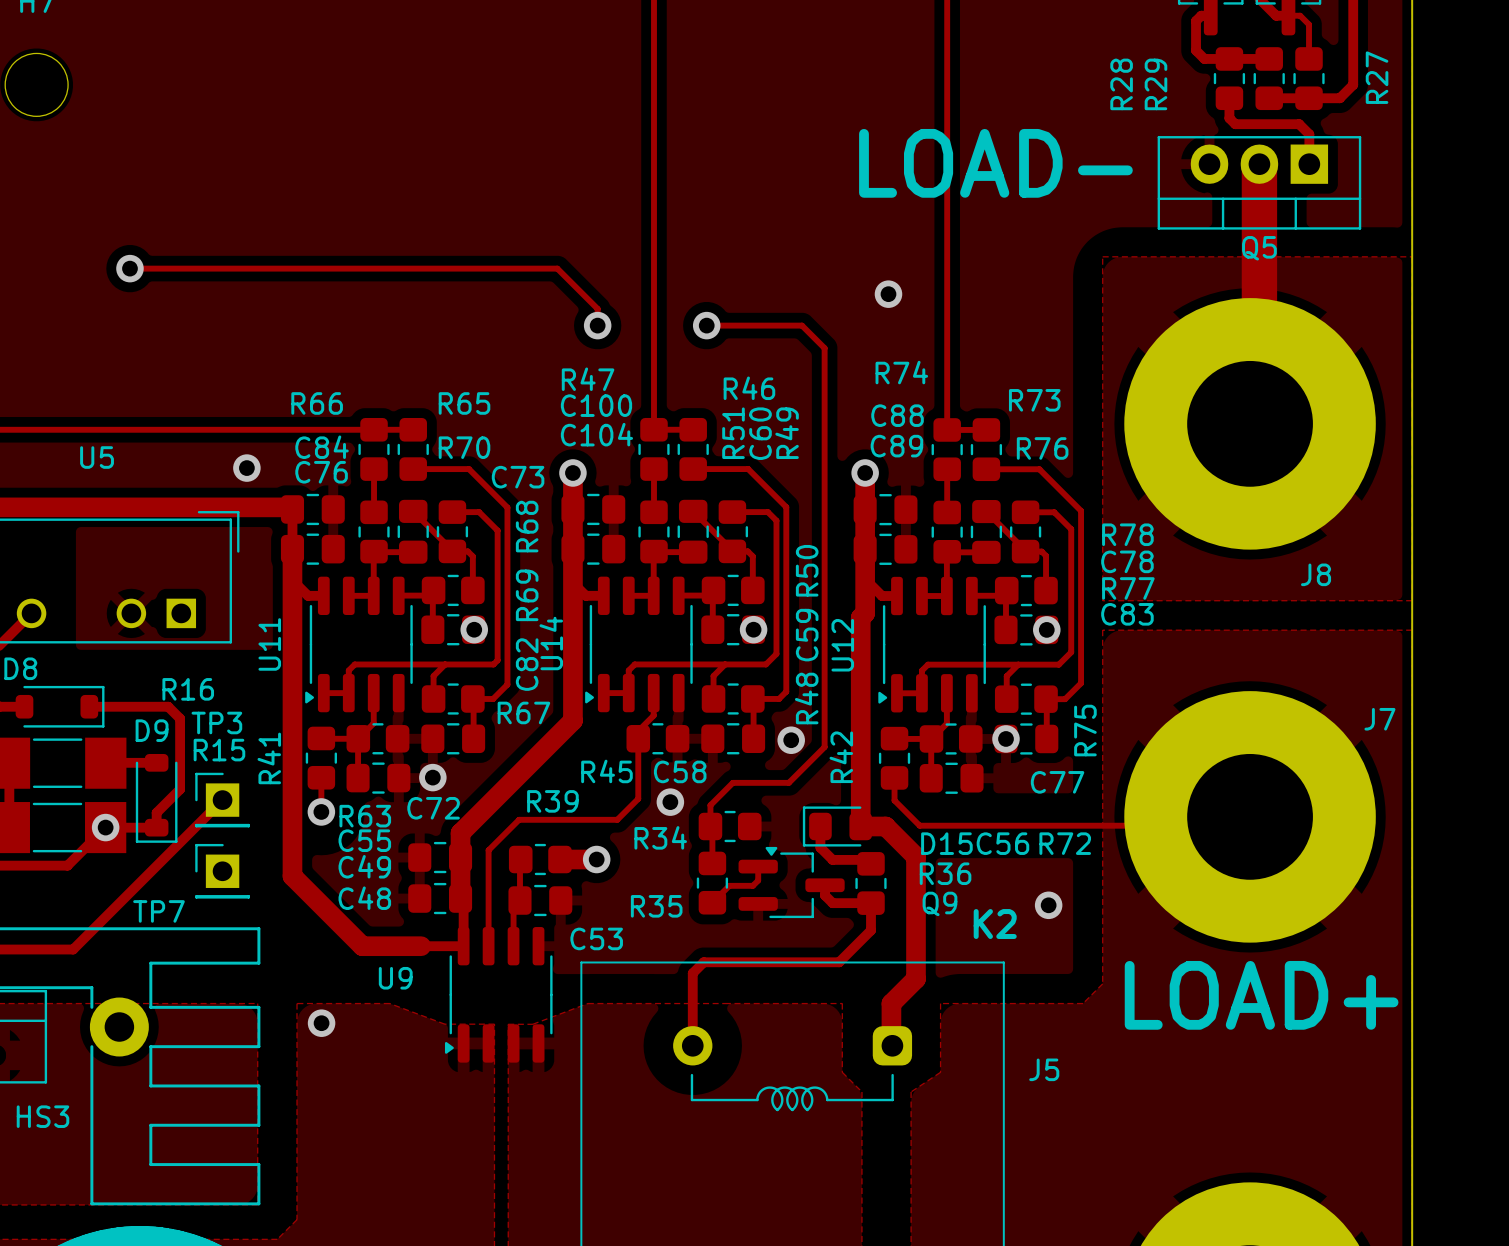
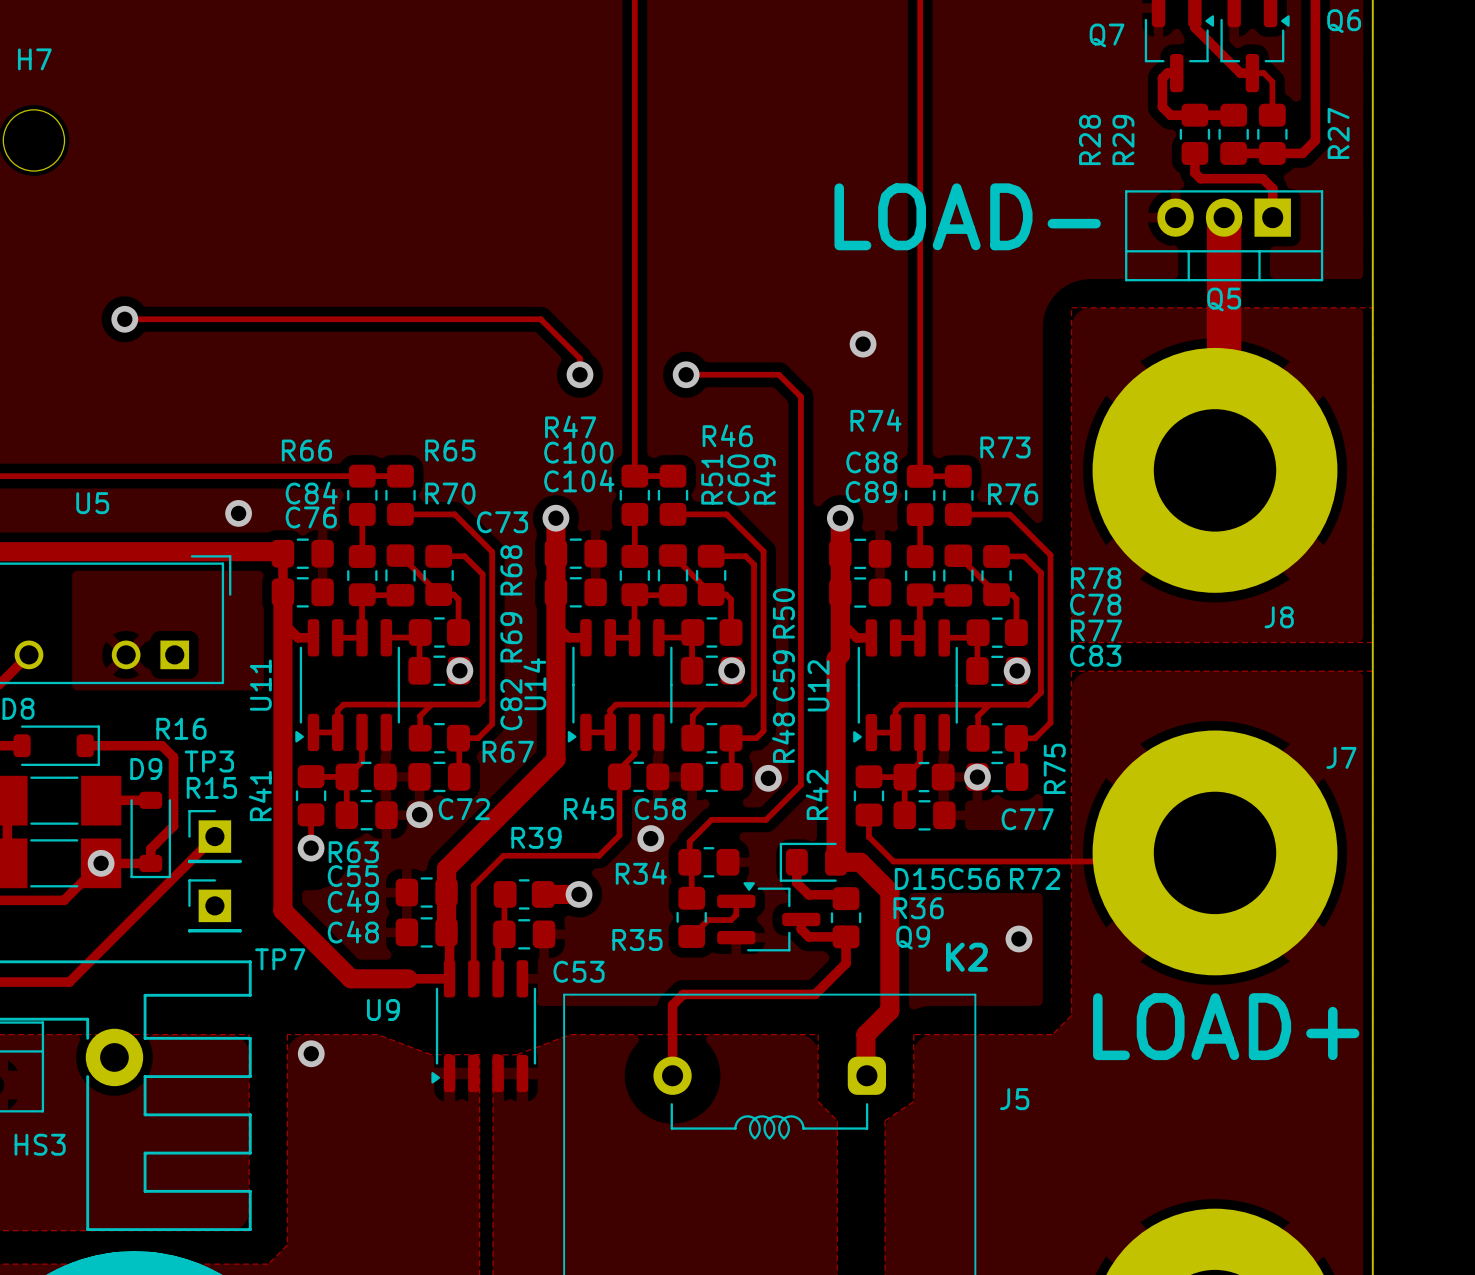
C72 name position: C72 (433, 808) -> C72 (464, 809)
TP7 name position: TP7 (158, 911) -> TP7 (280, 959)

